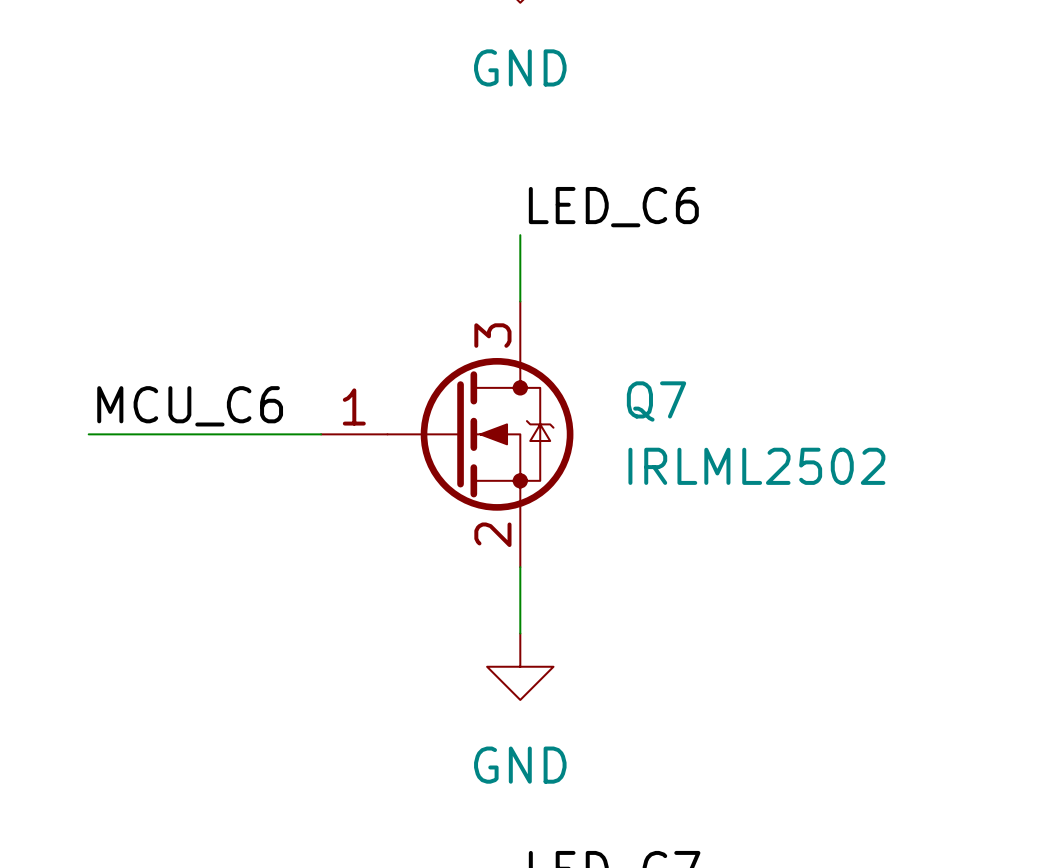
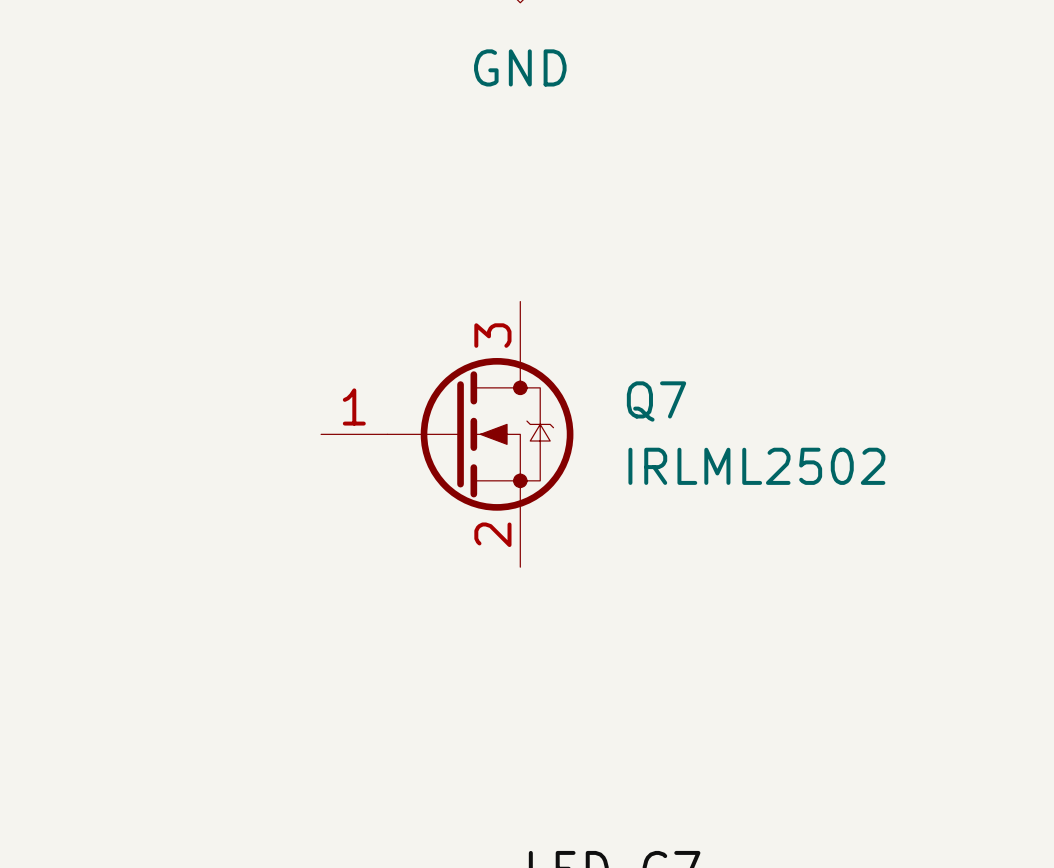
label: LED_C6 (613, 207) -> none
wire: (520, 235) (520, 301) -> none
label: MCU_C6 (190, 406) -> none
wire: (88, 434) (321, 434) -> none
wire: (520, 567) (520, 633) -> none
power symbol: GND (520, 666) -> none

